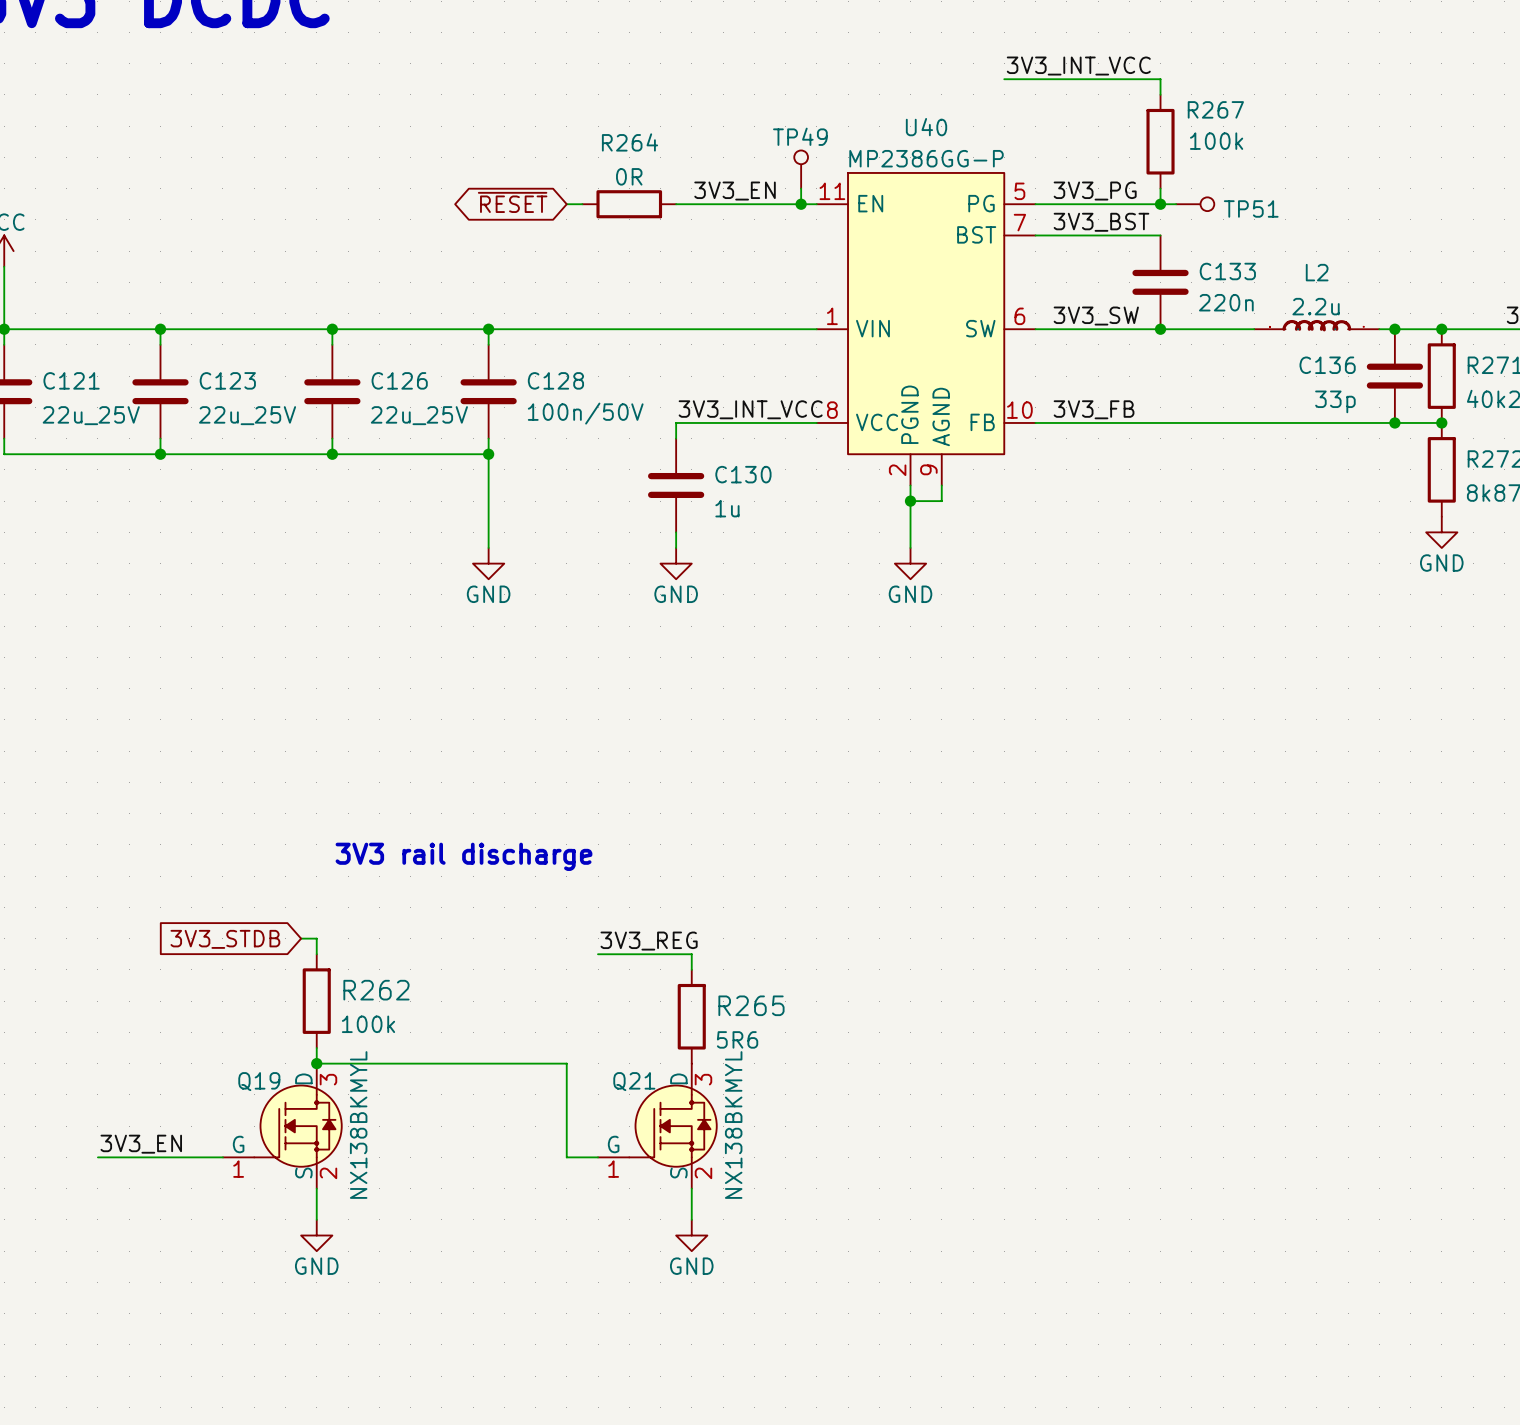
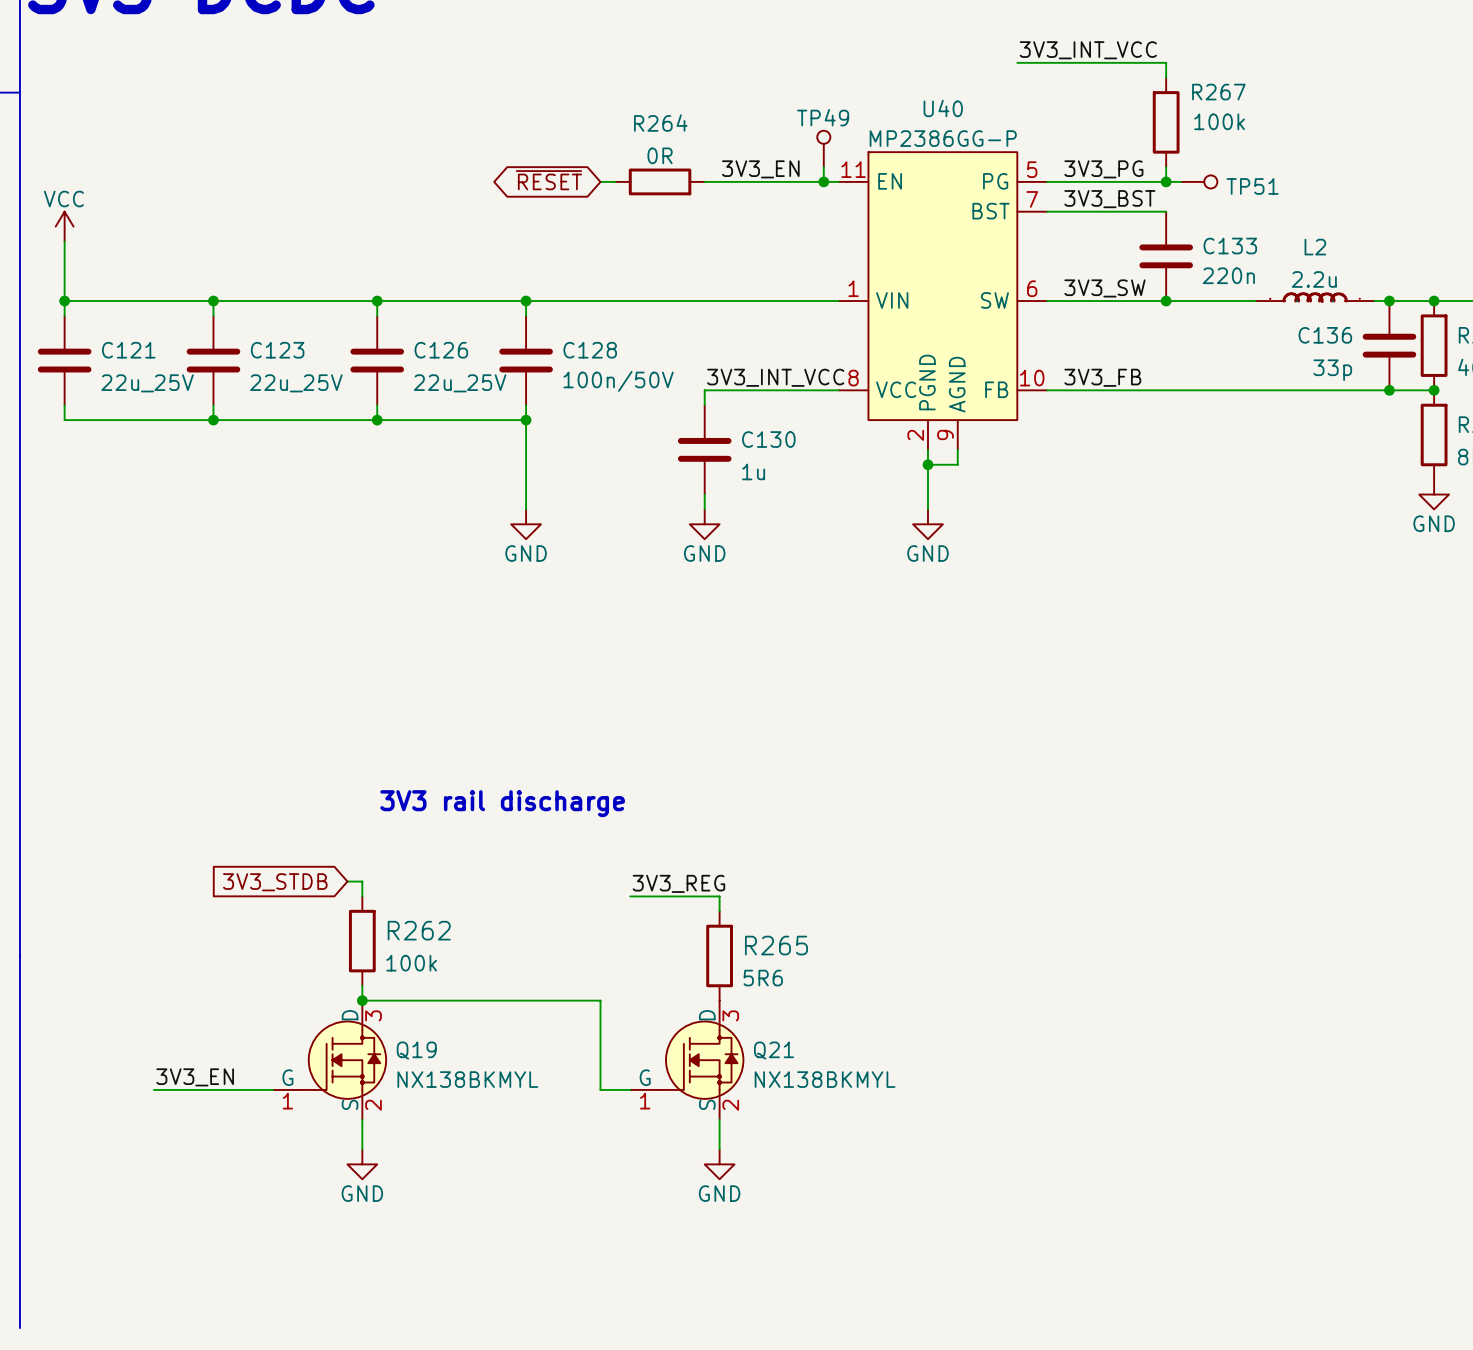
Q19 name position: Q19 (259, 1081) -> Q19 (416, 1050)
Q21 name position: Q21 (634, 1081) -> Q21 (774, 1050)
Q19 value rotation: 0° (358, 1125) -> 90° clockwise (467, 1079)
Q21 value rotation: 0° (733, 1125) -> 90° clockwise (825, 1079)

